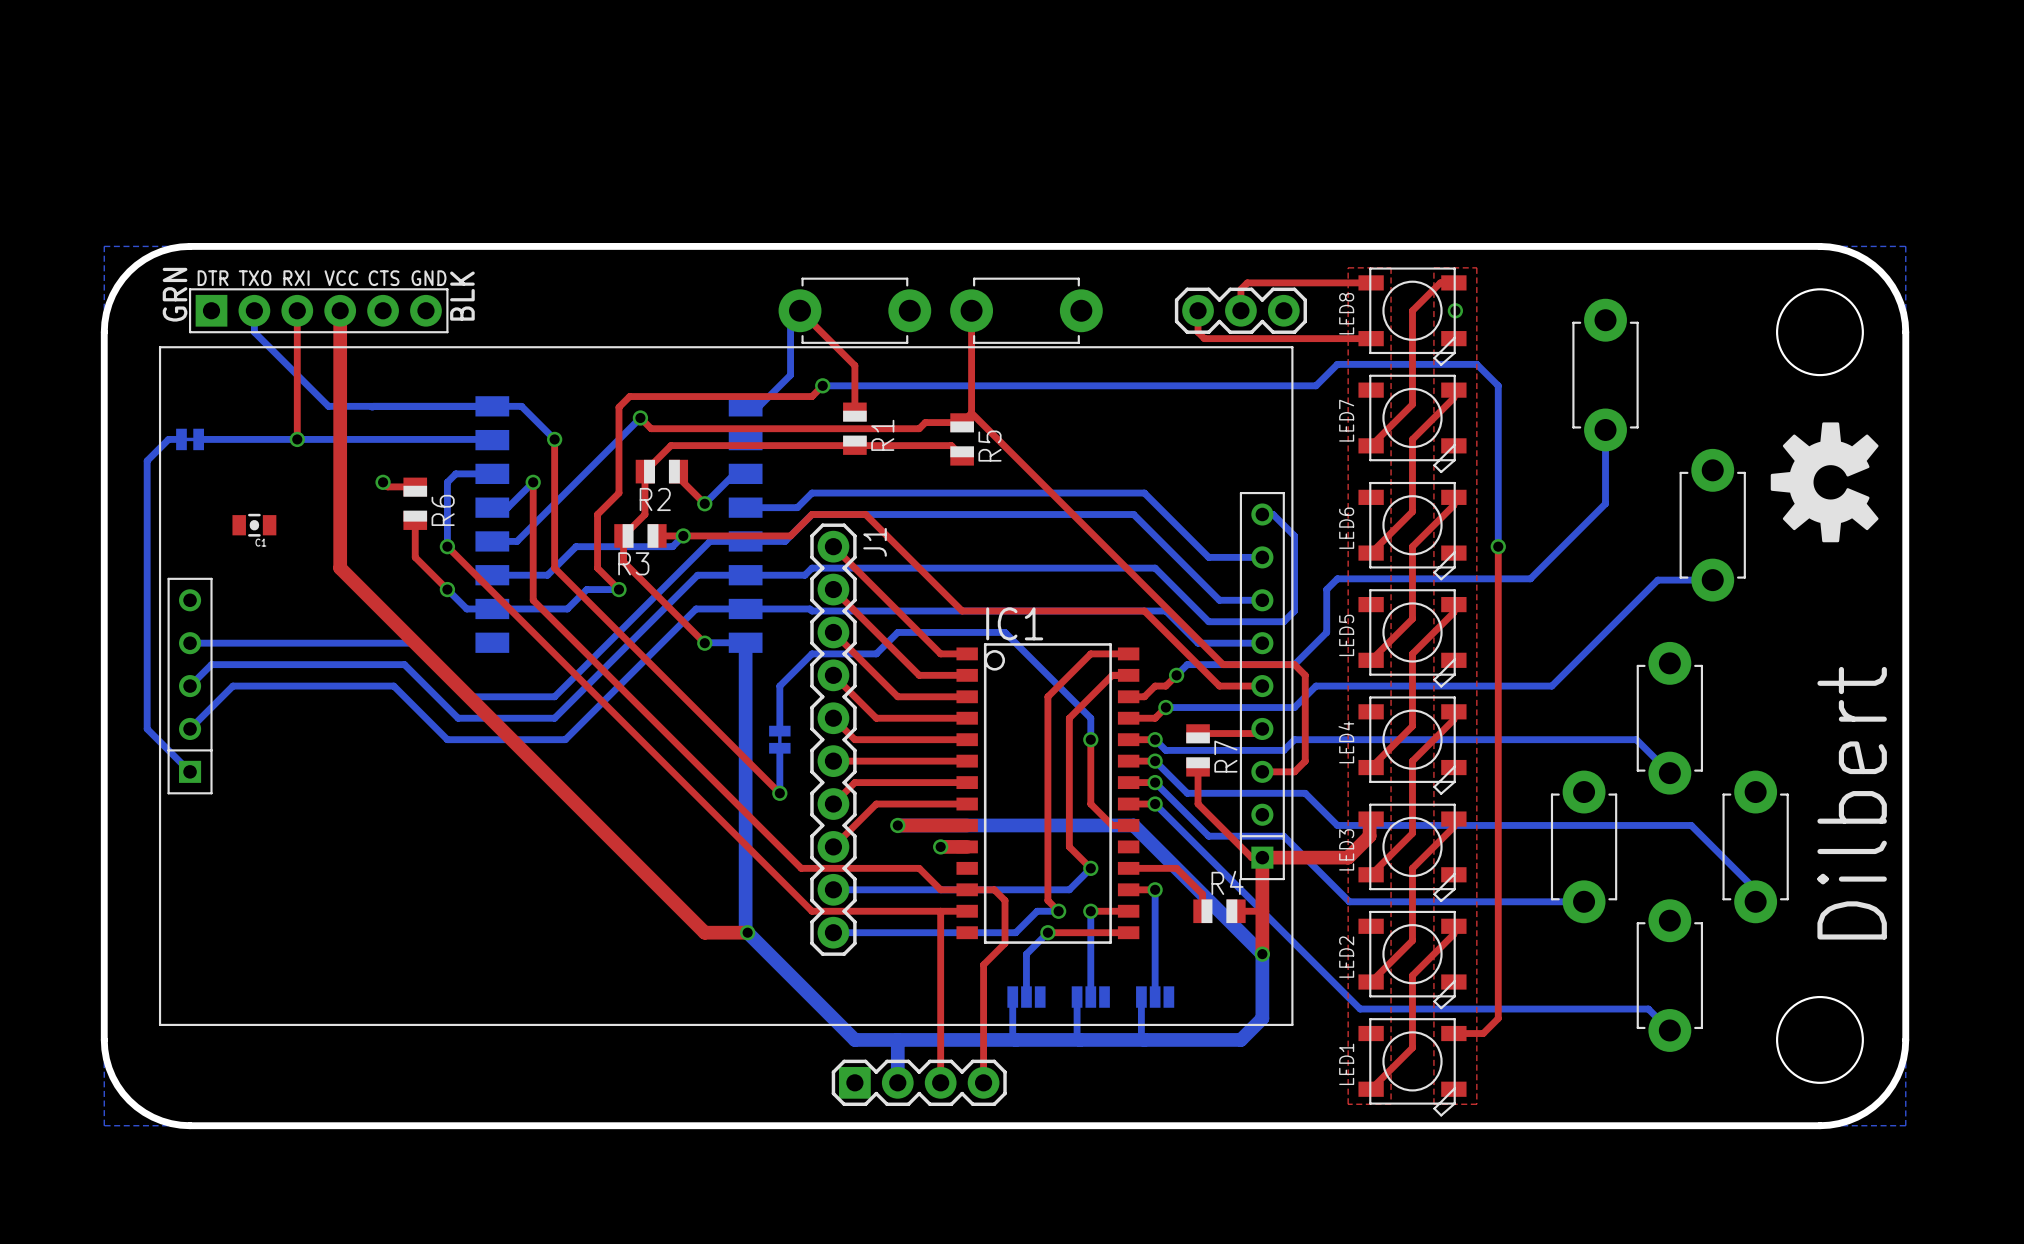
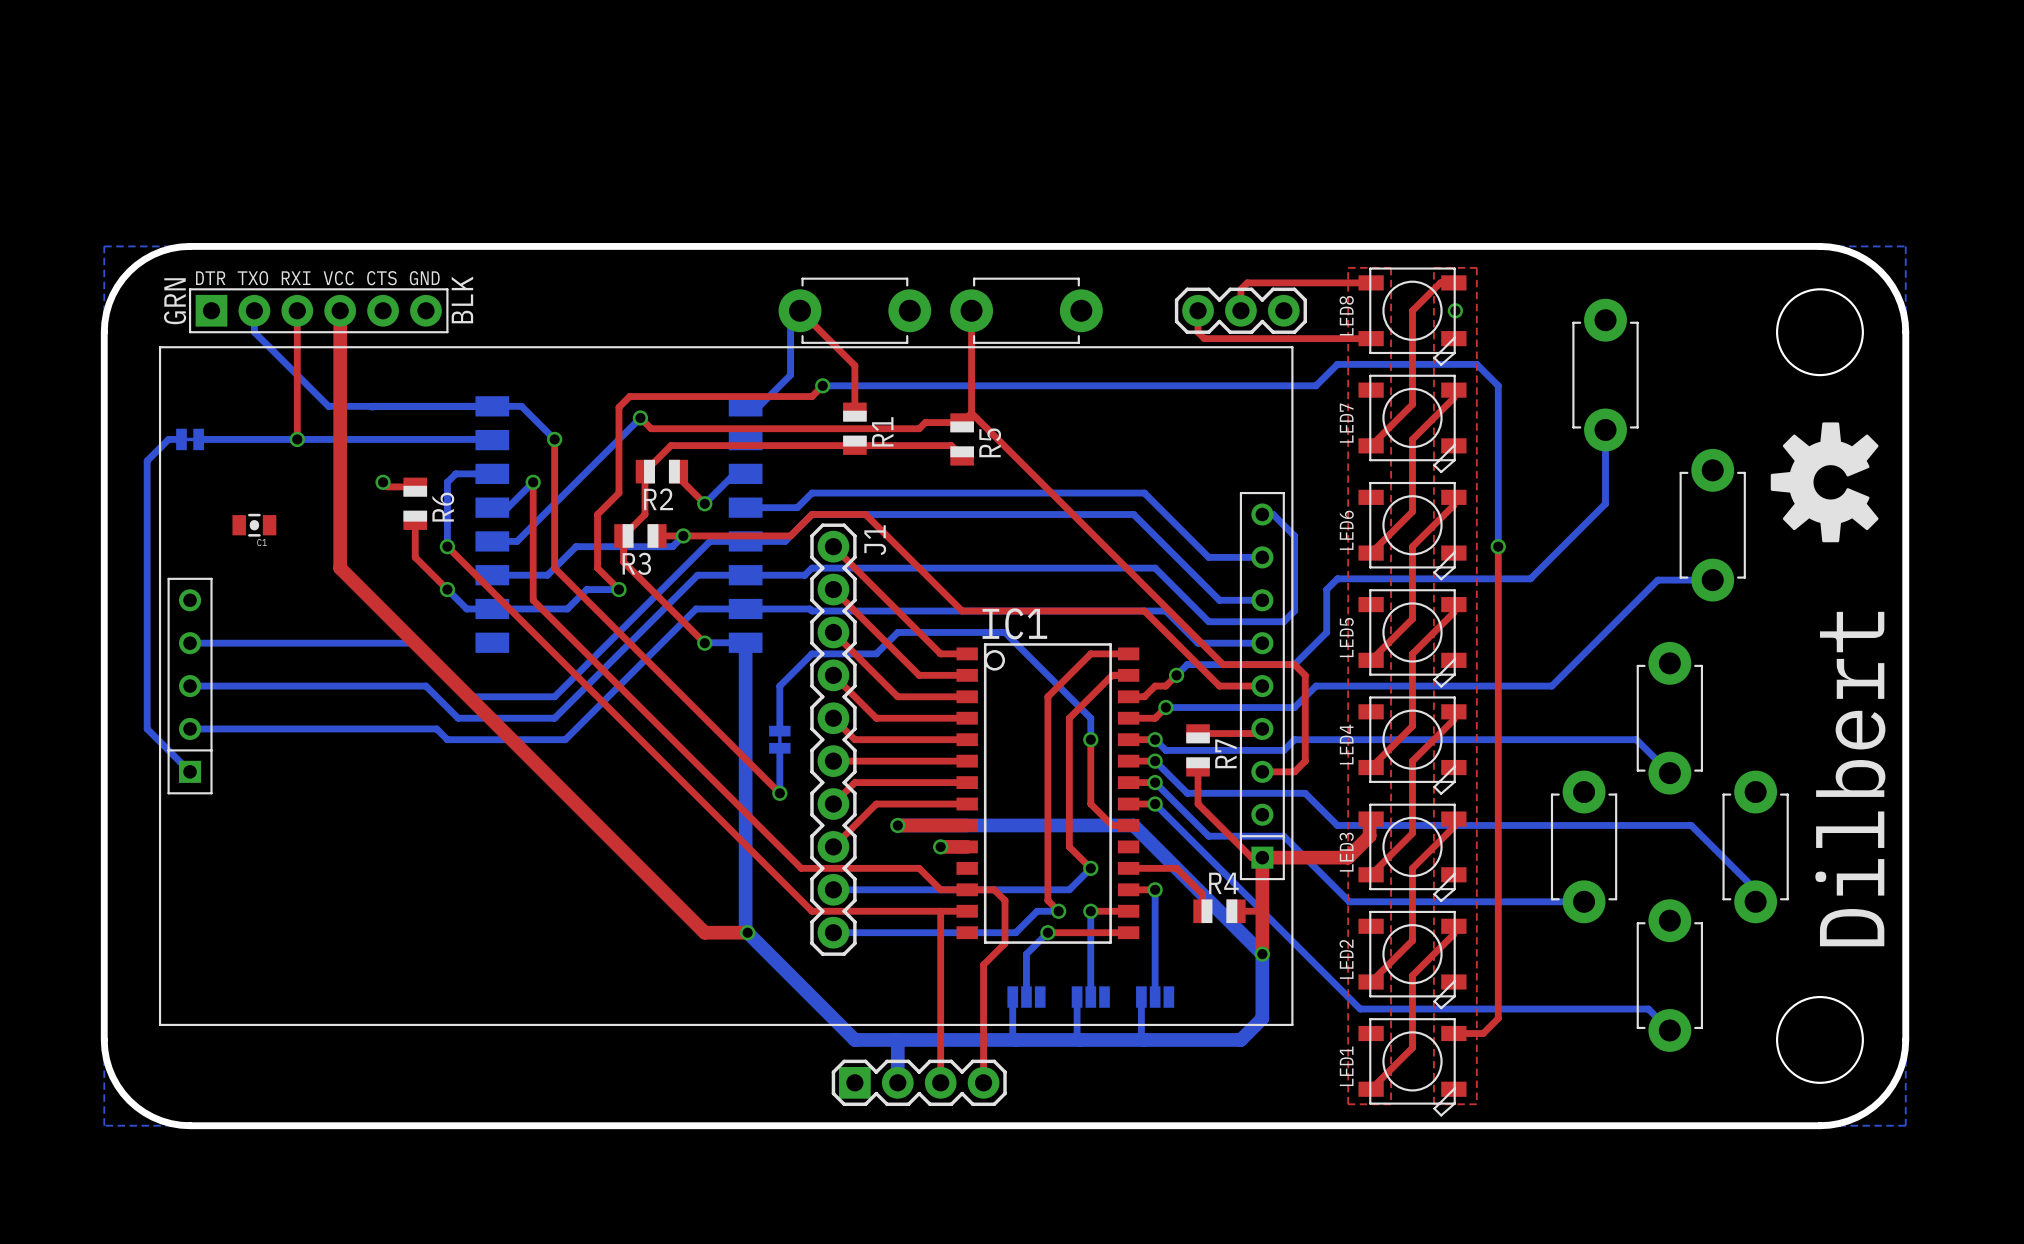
bottom track: (190, 686) (211, 664) (404, 664) (425, 686) -> none
bottom track: (232, 686) (190, 728) -> (232, 686) (190, 686)
bottom track: (393, 686) (436, 728) -> (393, 686) (425, 686)
bottom track: none -> (190, 728) (436, 728)

